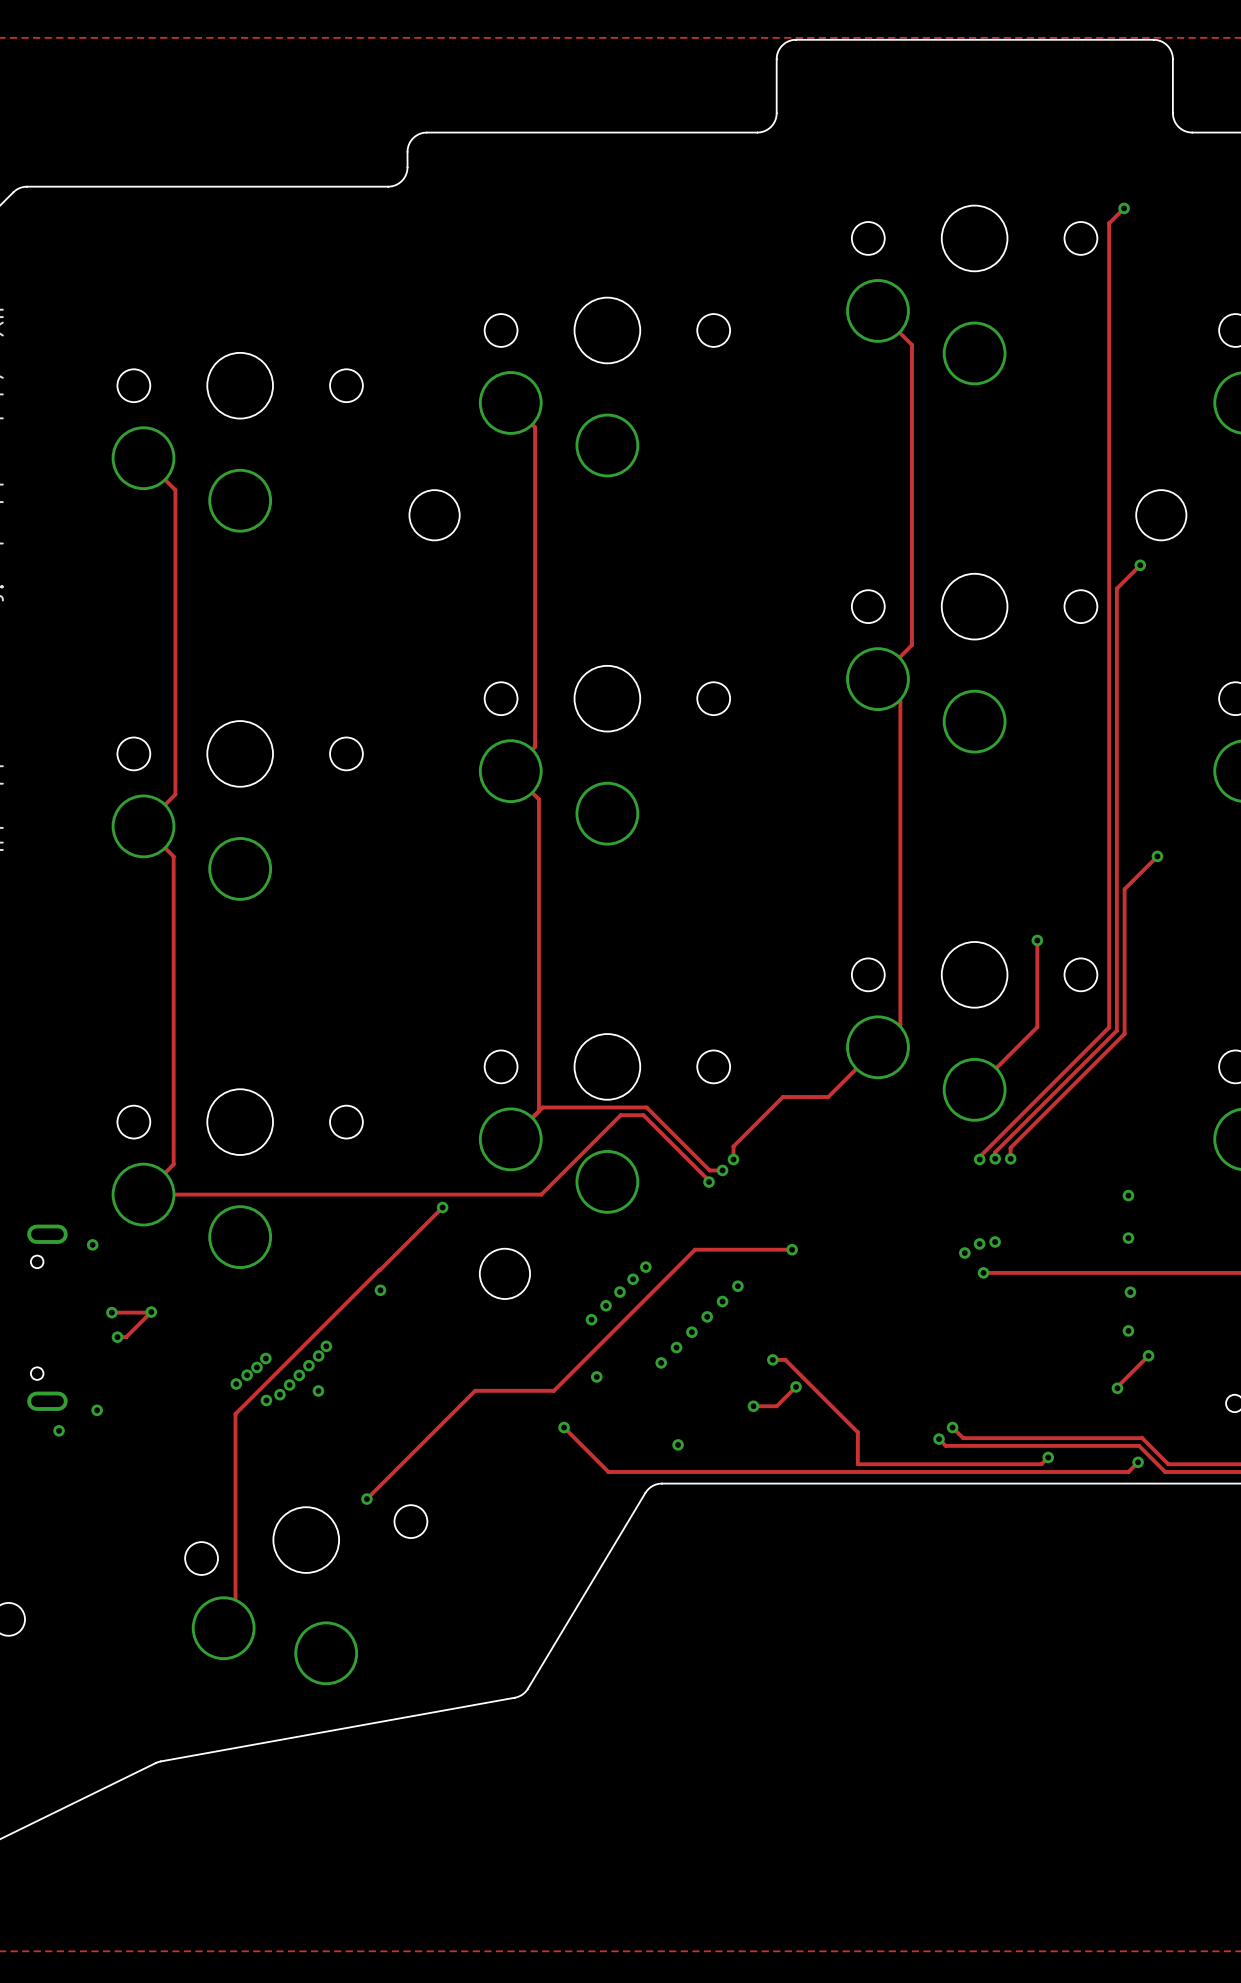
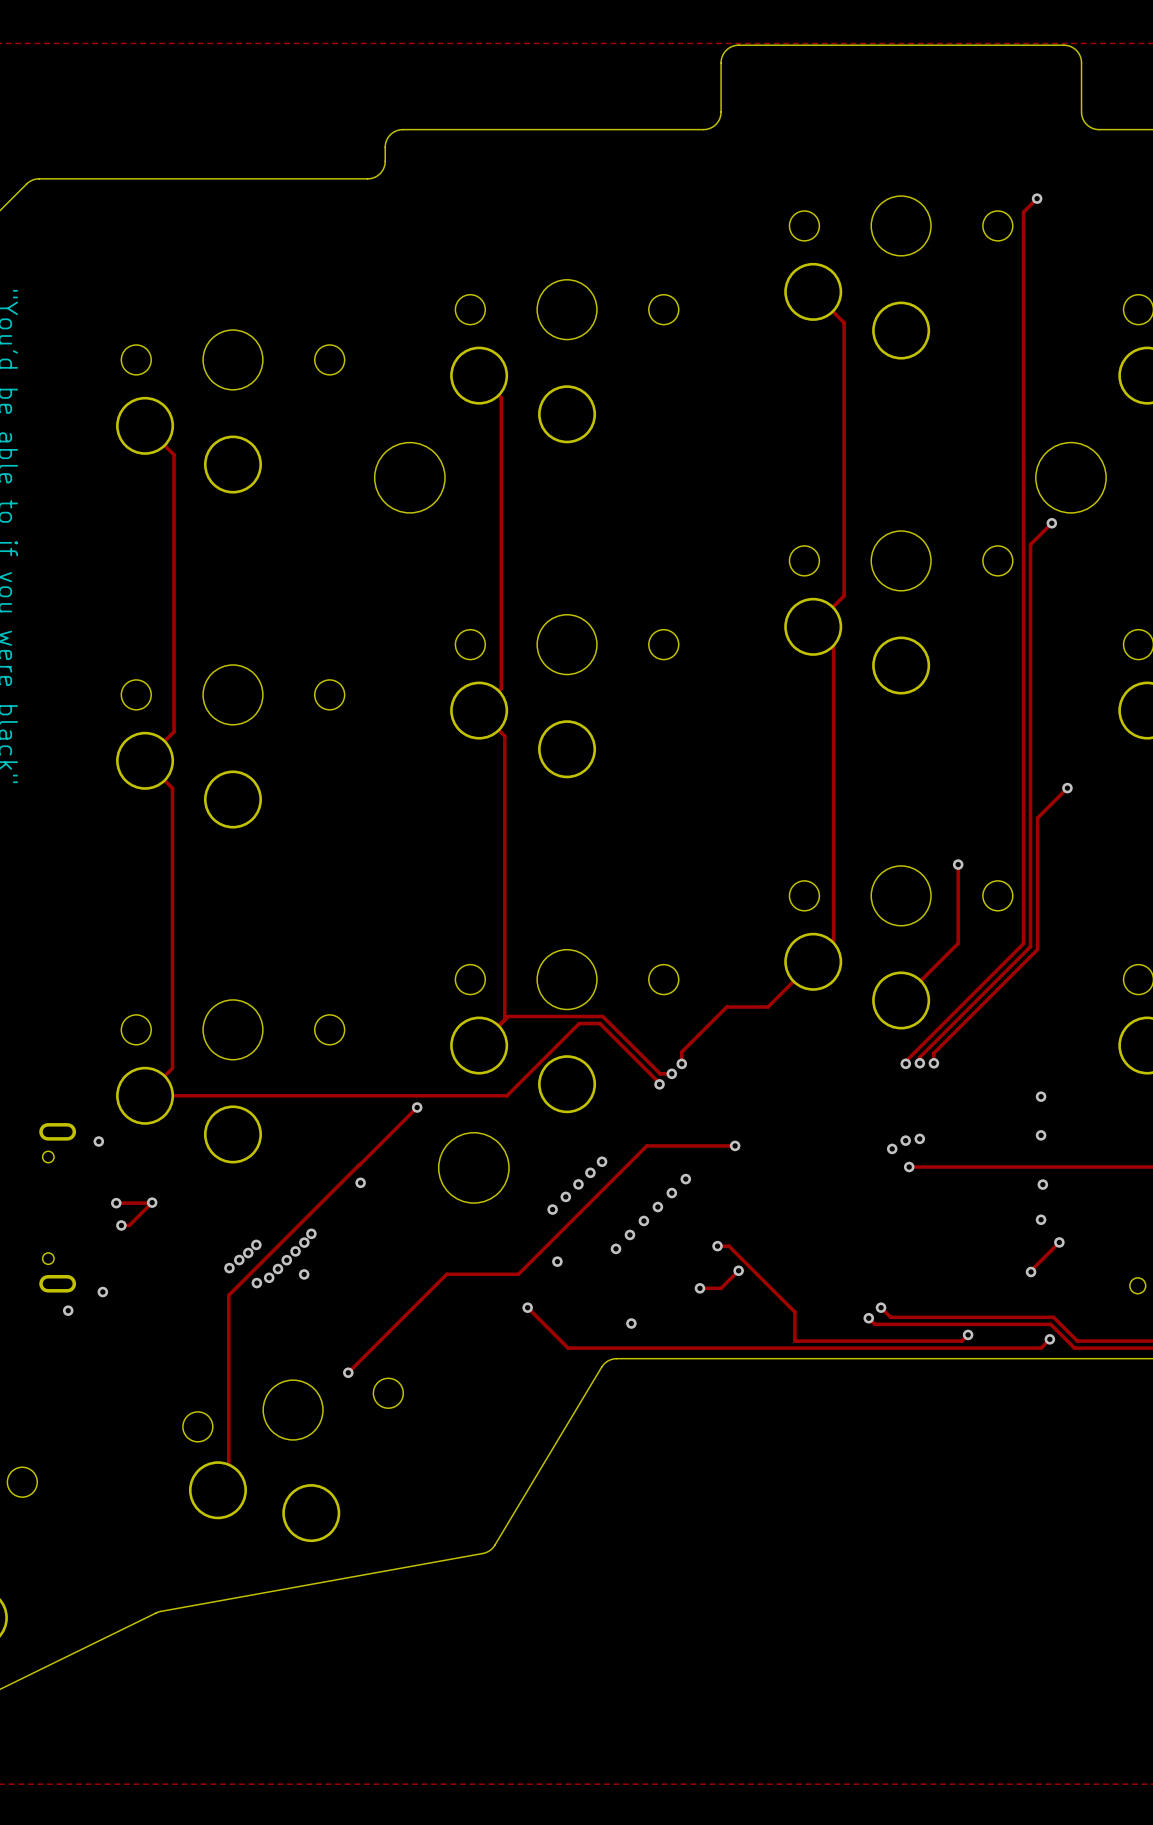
round board edge size: [408, 489, 461, 541] -> [374, 442, 446, 514]
round board edge size: [1135, 489, 1187, 541] -> [1035, 442, 1107, 514]
round board edge size: [479, 1248, 531, 1300] -> [438, 1132, 510, 1204]

